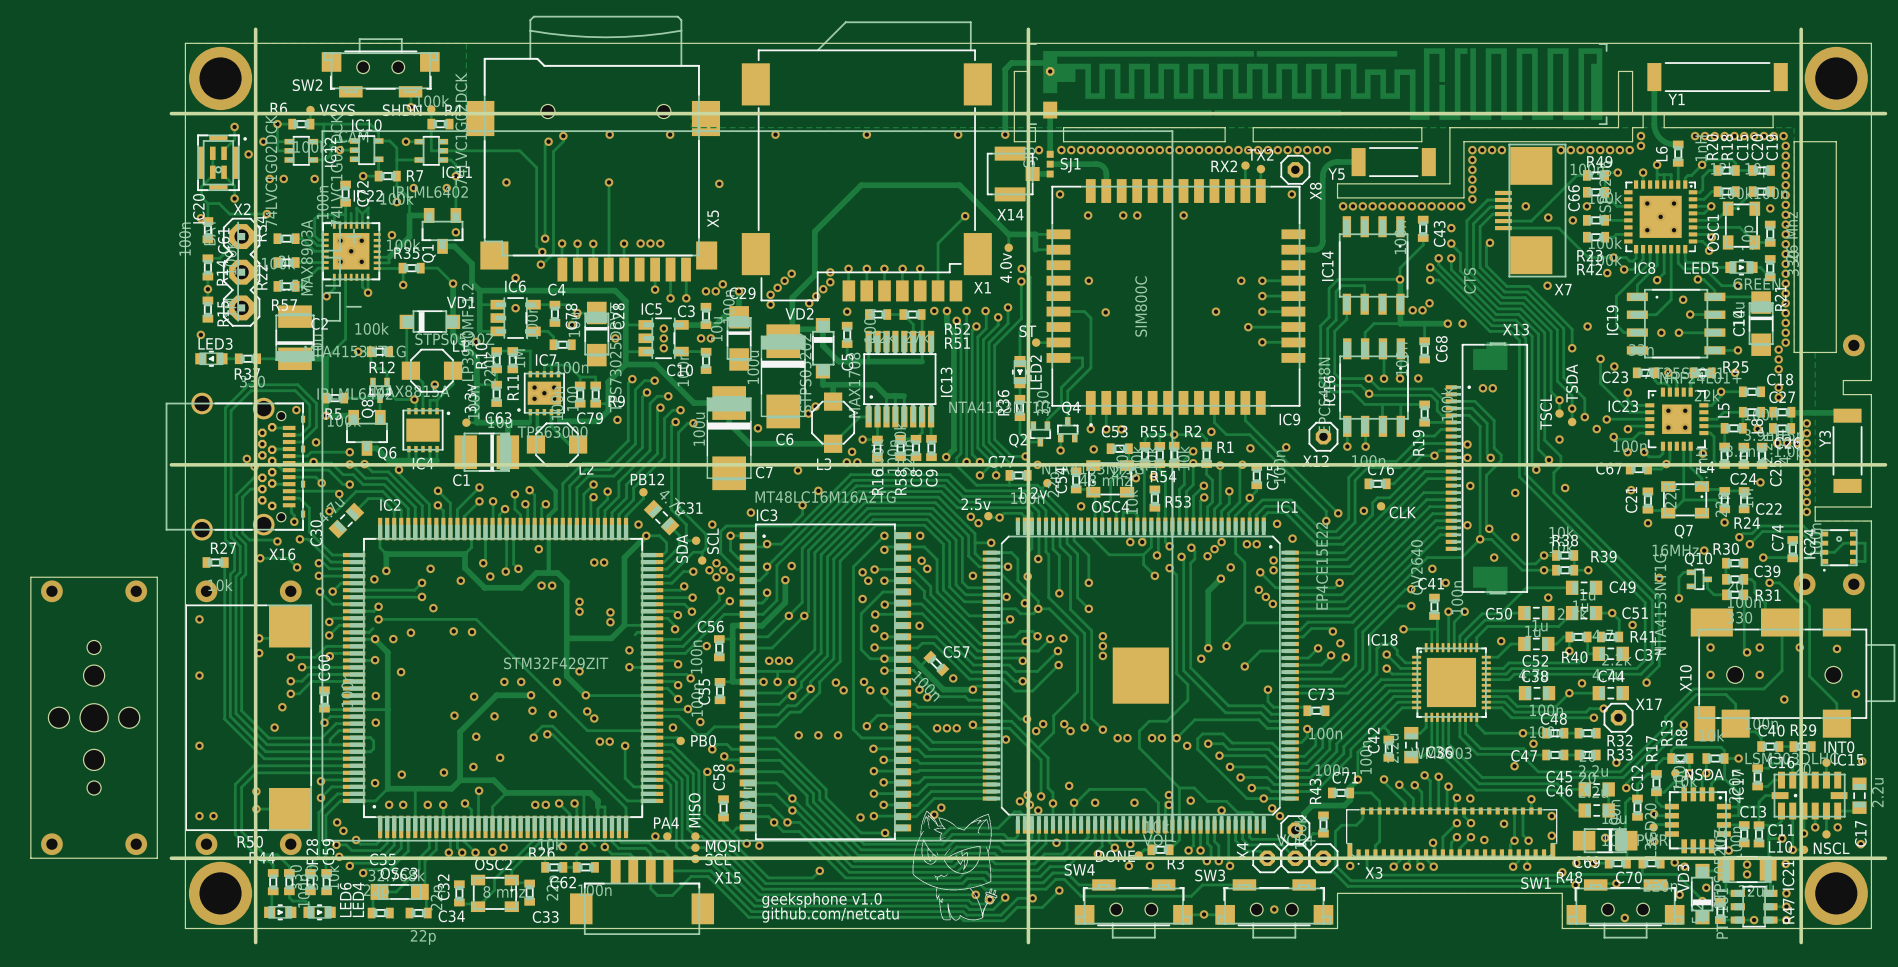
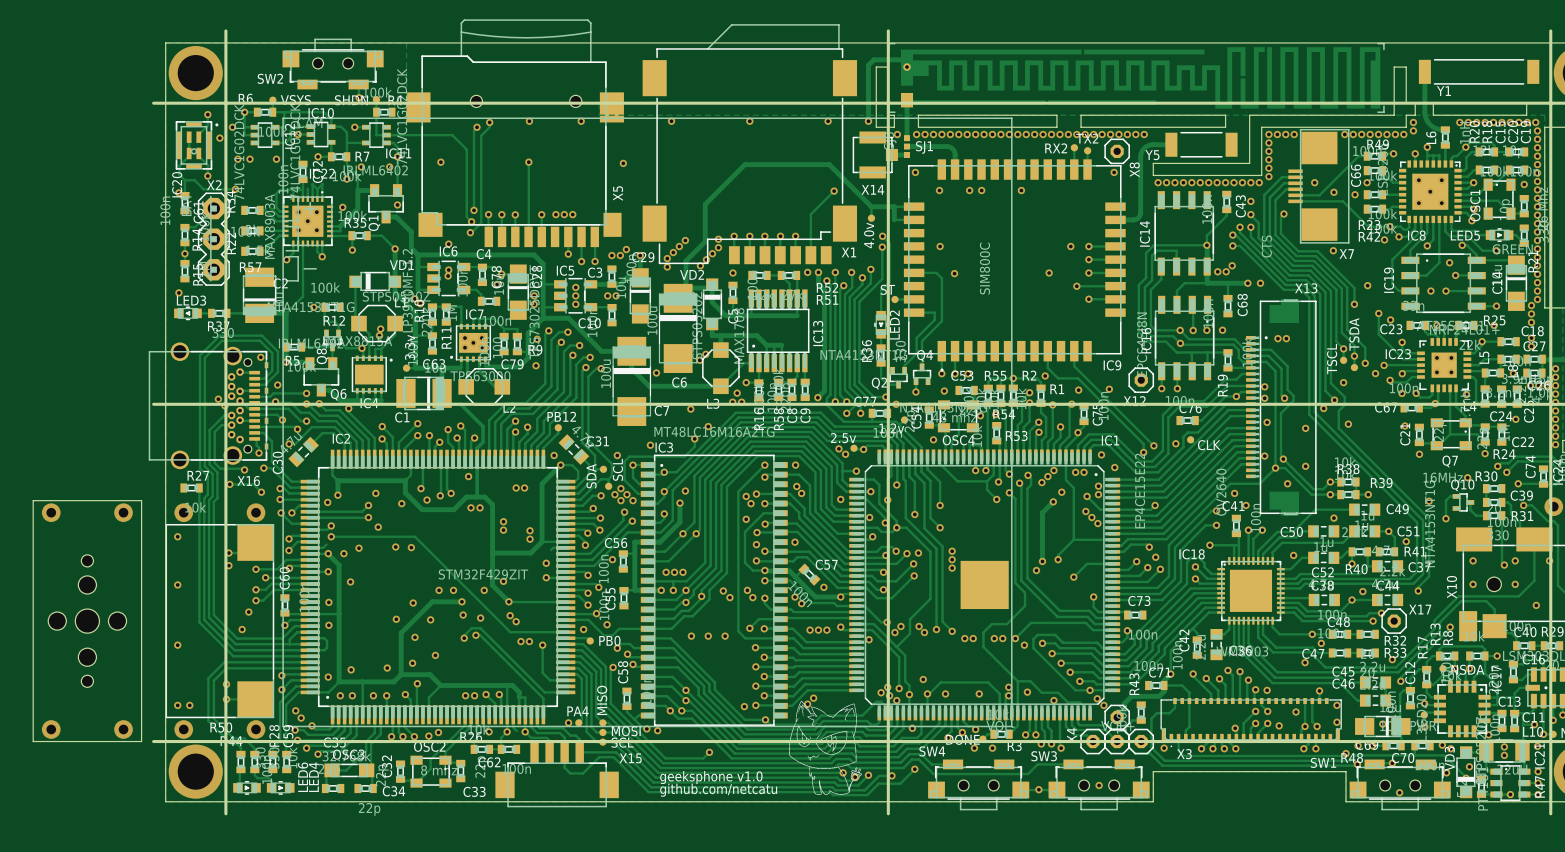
via: none -> (448, 276)
via: none -> (420, 303)
via: none -> (534, 304)
via: none -> (380, 329)
via: none -> (537, 339)

